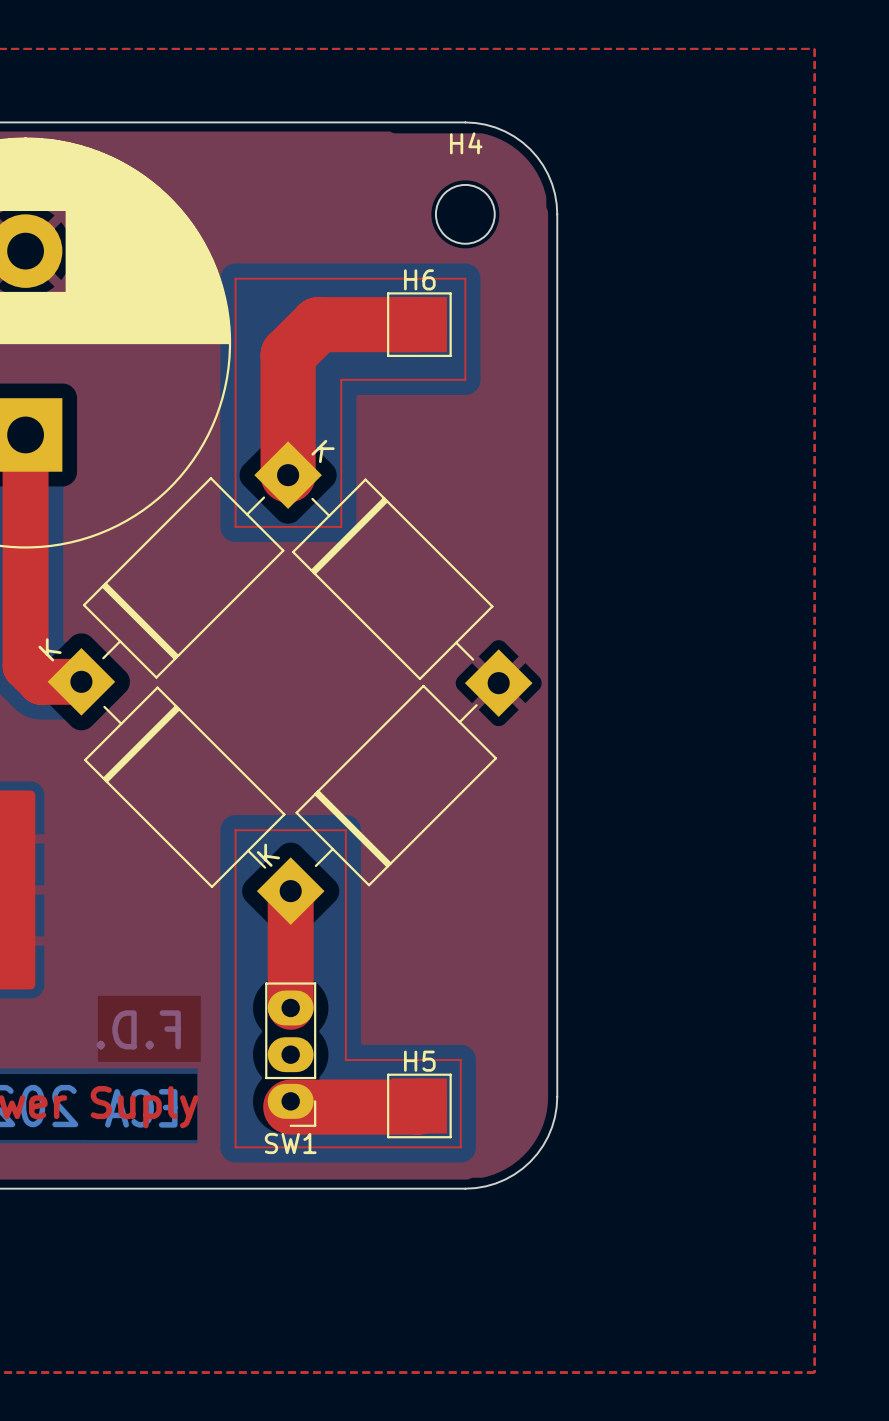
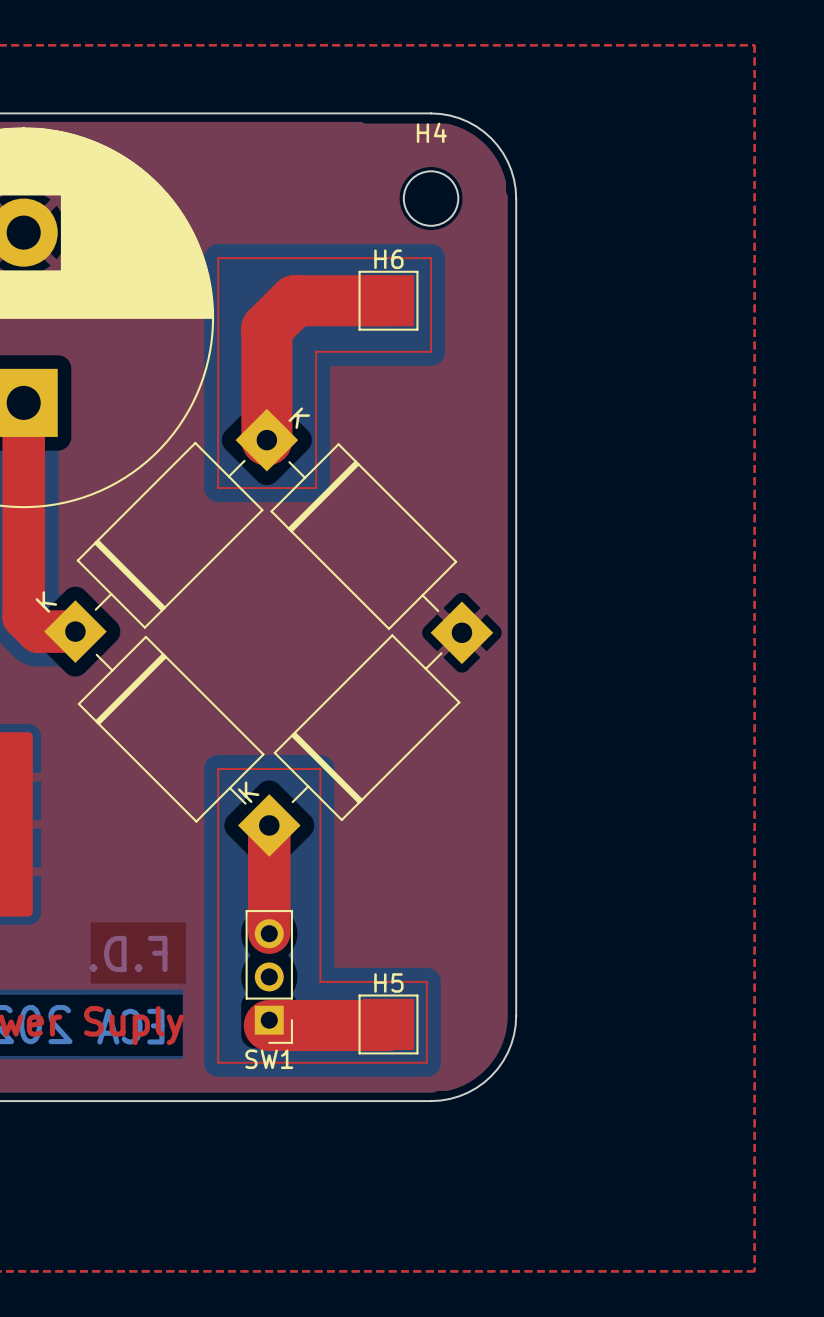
SW1 footprint: [265, 982, 317, 1127] -> [245, 910, 293, 1044]

